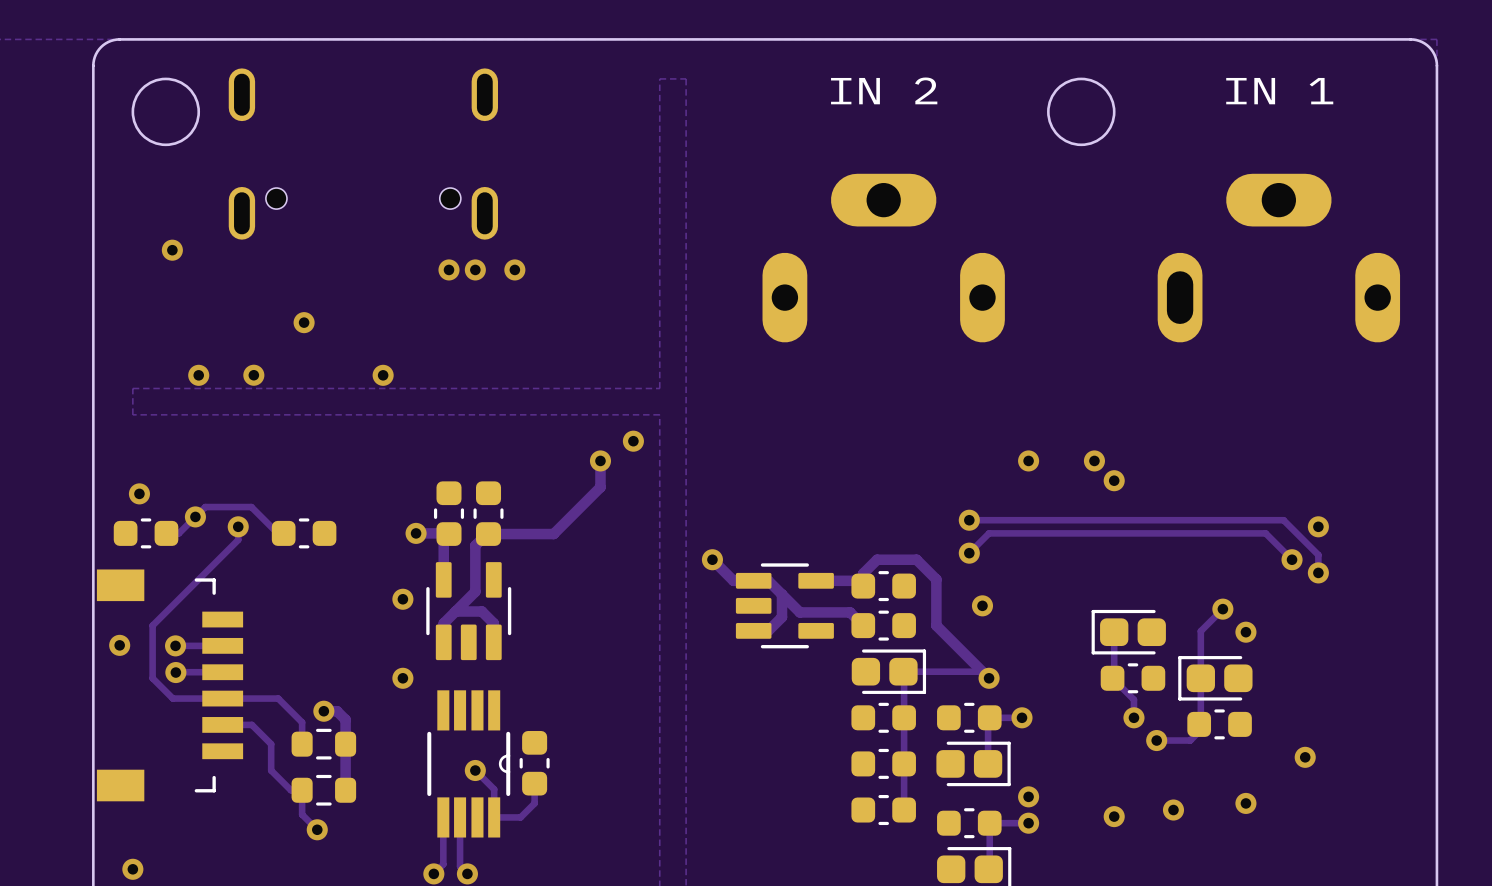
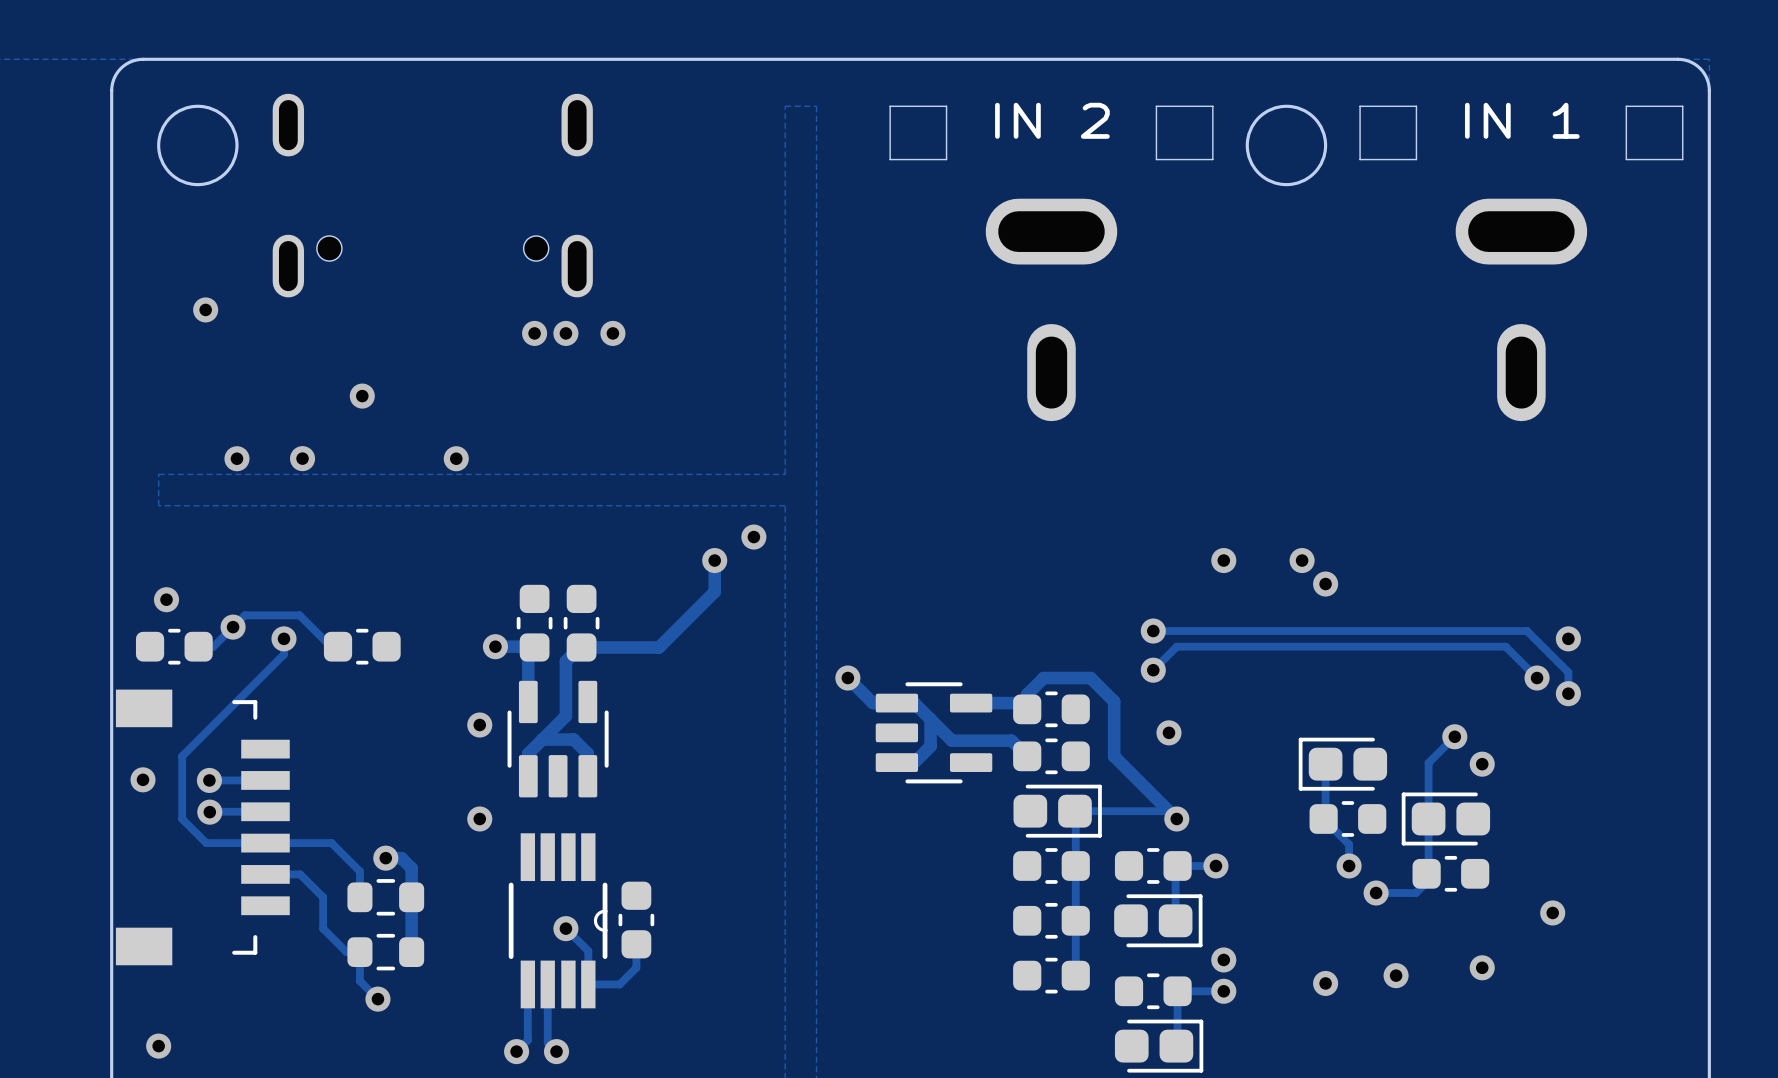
part: none -> (1051, 263)
part: none -> (1521, 263)
part: (883, 258) -> none
part: (1278, 258) -> none

